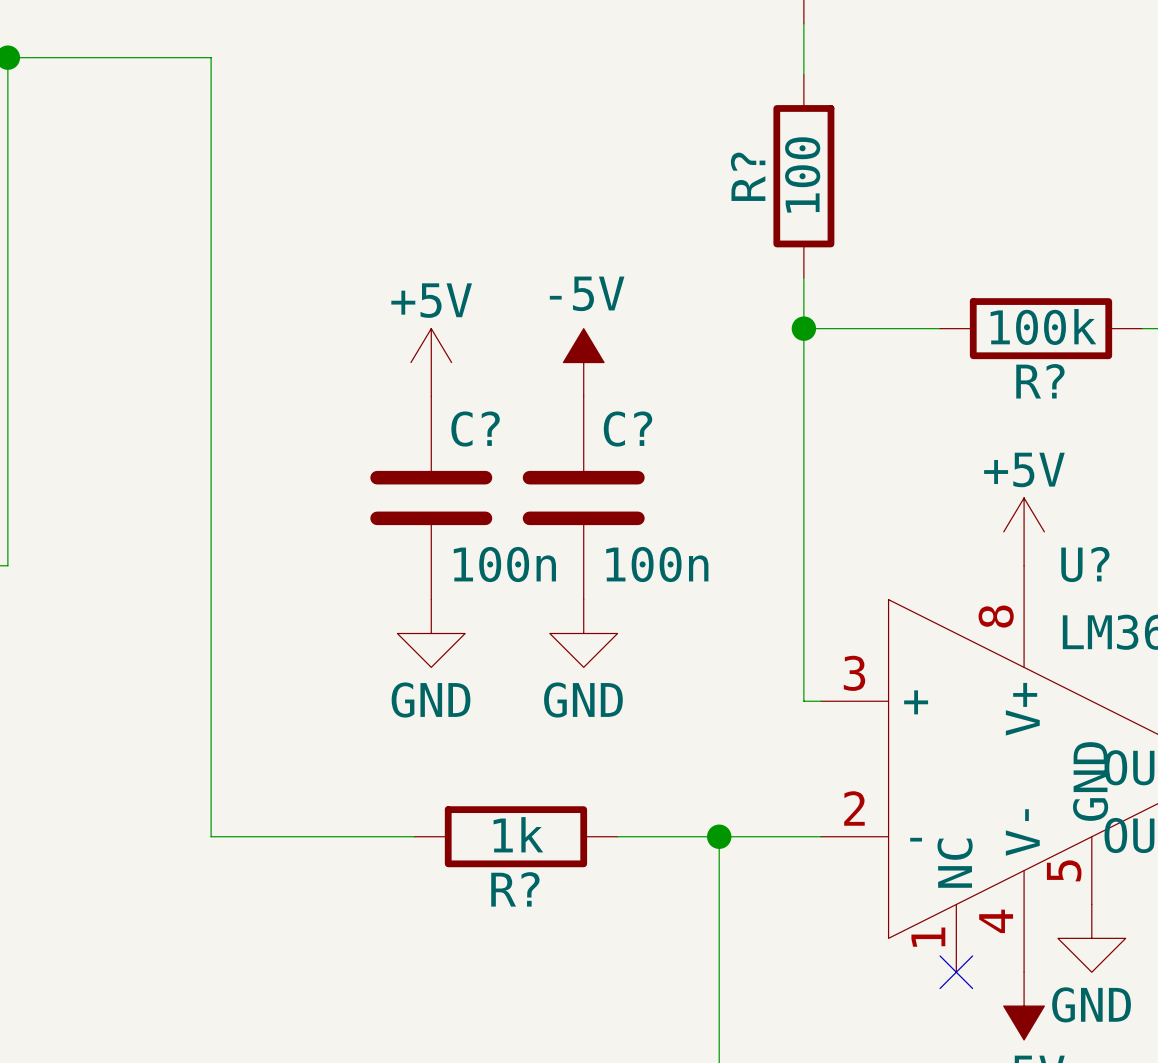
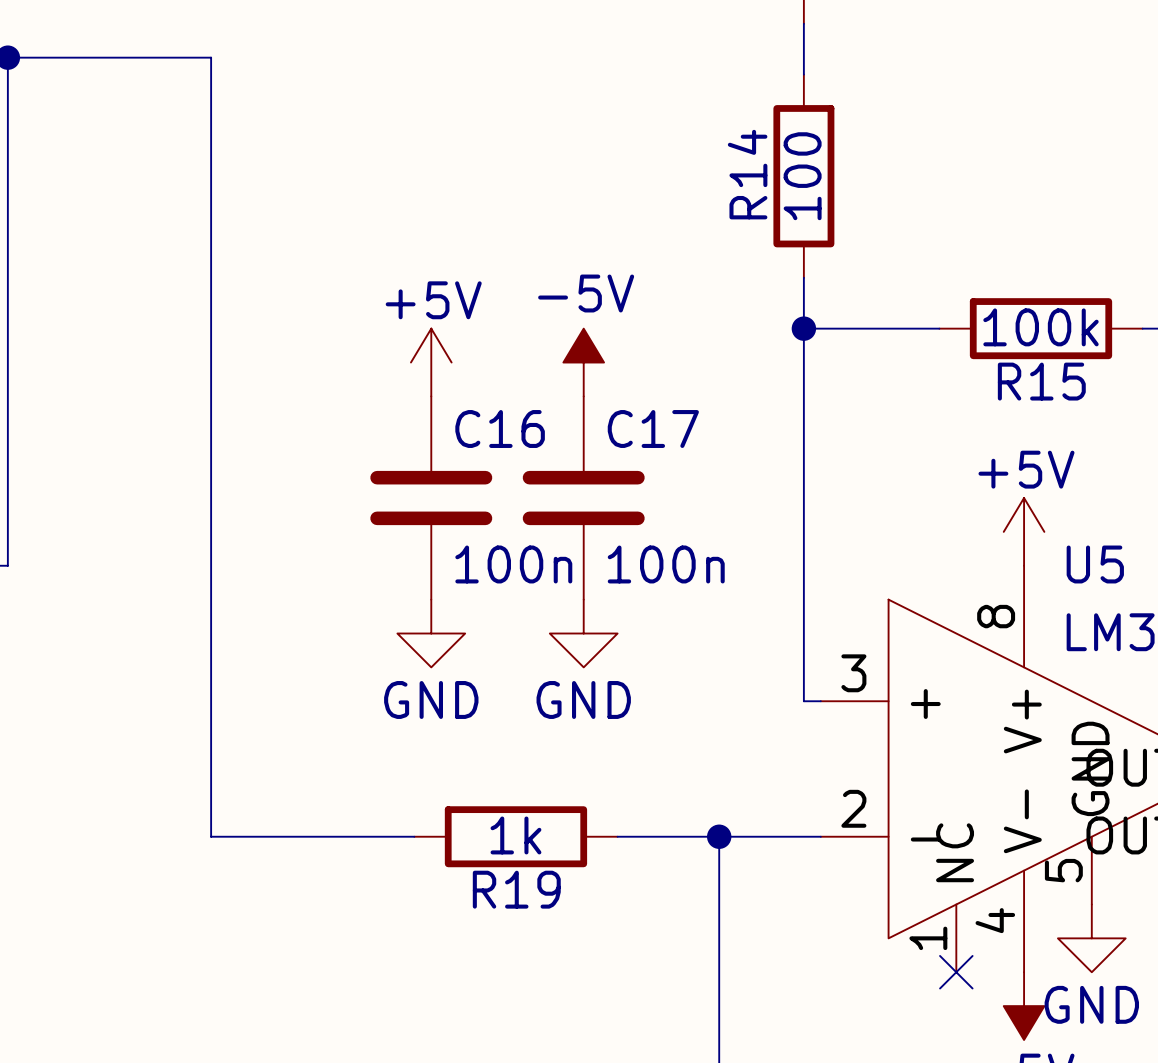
R? name: R? (748, 176) -> R14 (747, 174)
R? name: R? (1040, 381) -> R15 (1041, 381)
C? name: C? (475, 429) -> C16 (500, 429)
C? name: C? (628, 429) -> C17 (653, 429)
U? name: U? (1085, 564) -> U5 (1095, 564)
R? name: R? (515, 889) -> R19 (516, 889)

